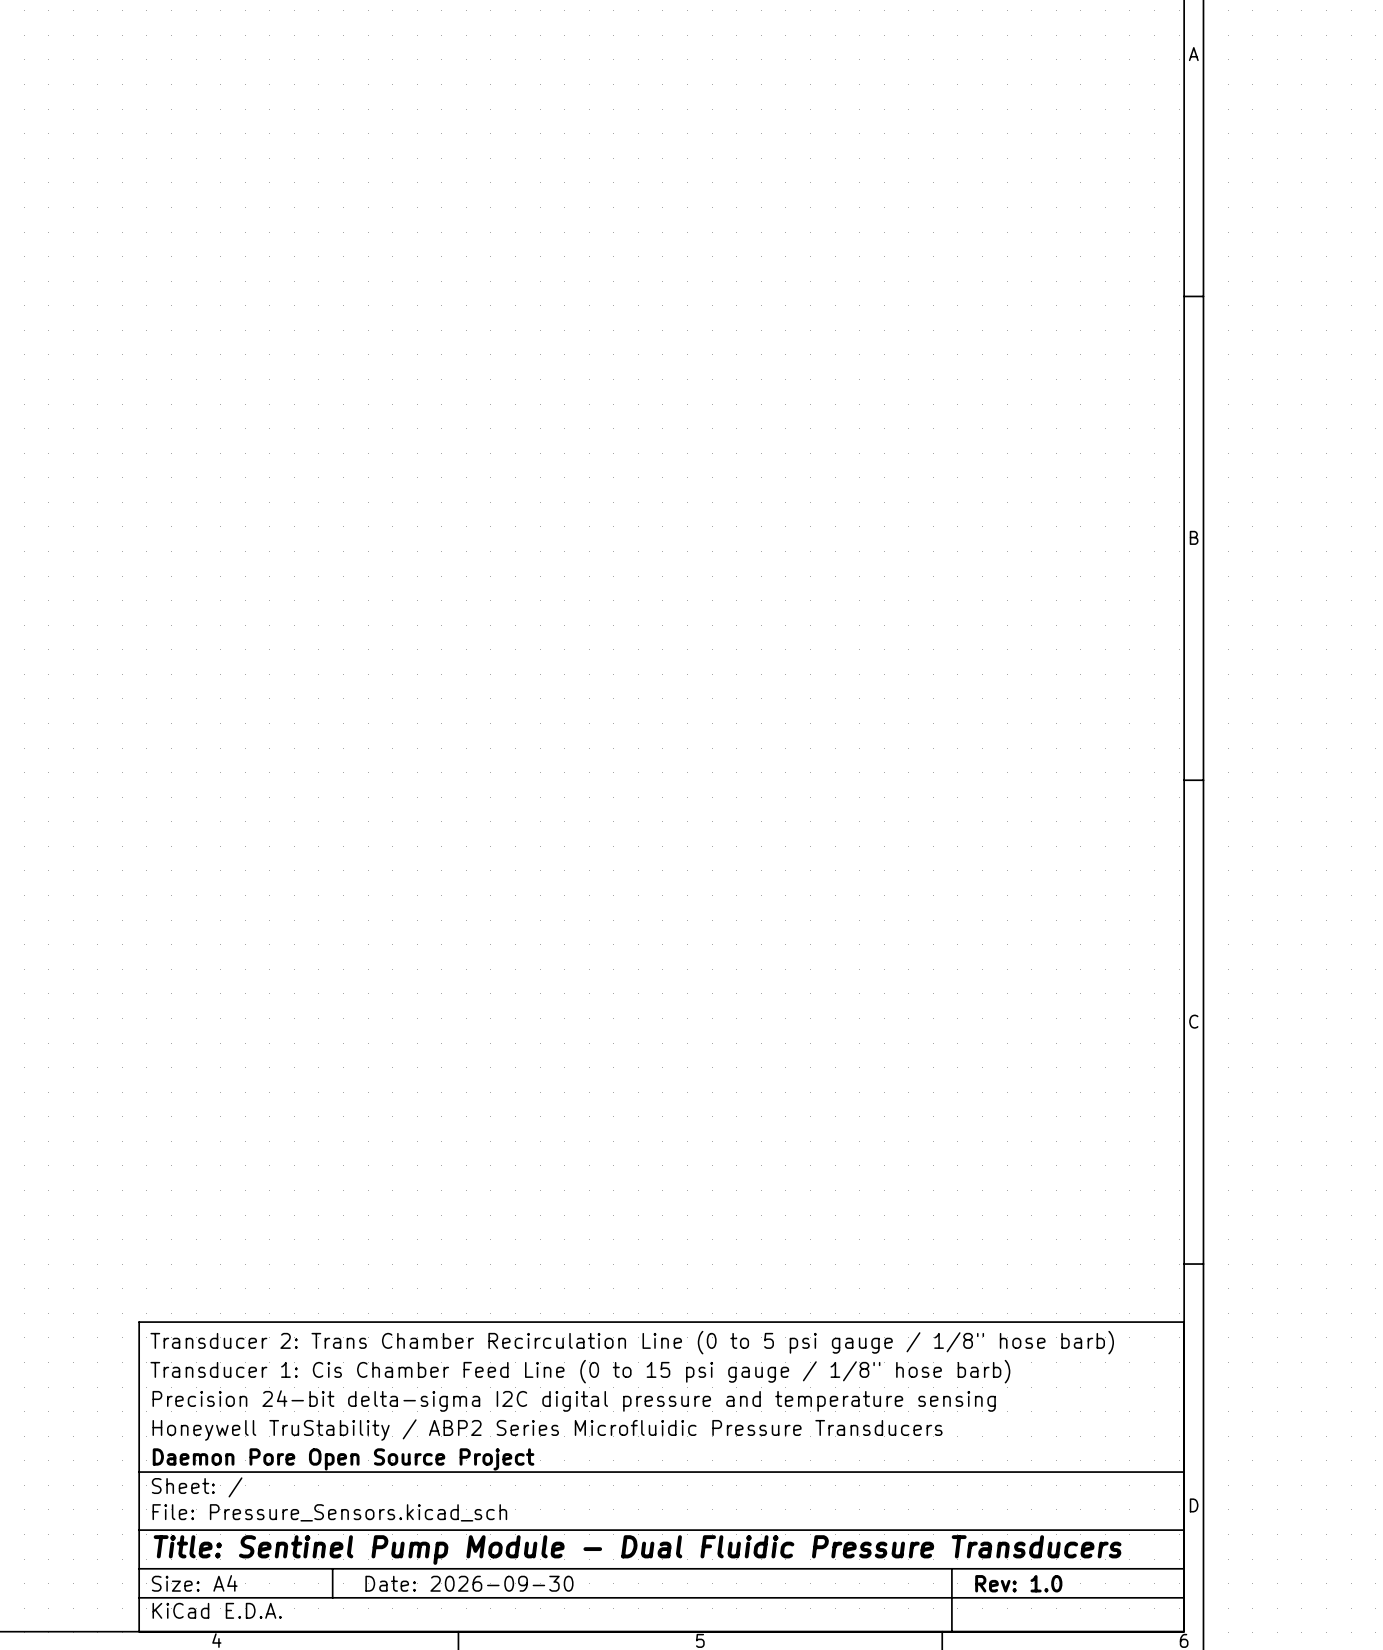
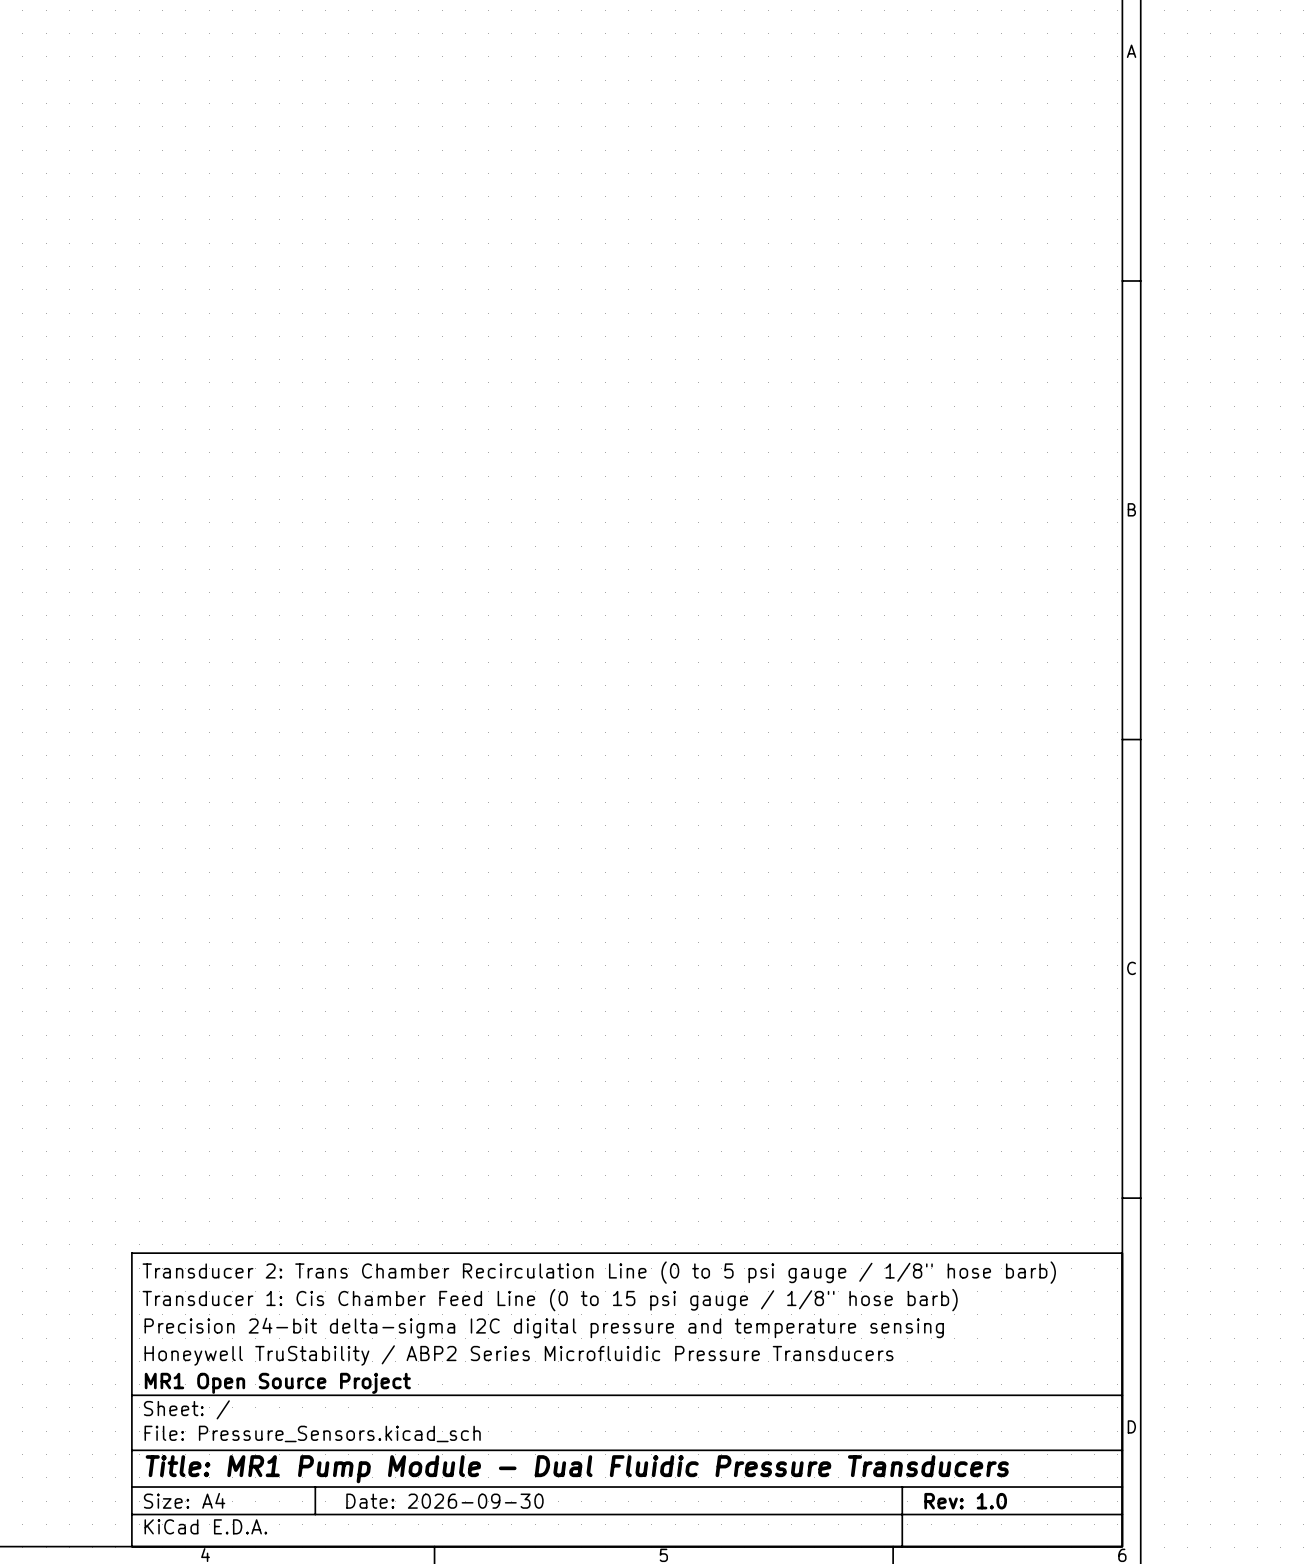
title block: Daemon Pore Open Source Project (343, 1459) -> MR1 Open Source Project (277, 1383)
title block: Title: Sentinel Pump Module - Dual Fluidic Pressure Transducers (637, 1550) -> Title: MR1 Pump Module - Dual Fluidic Pressure Transducers (577, 1469)

